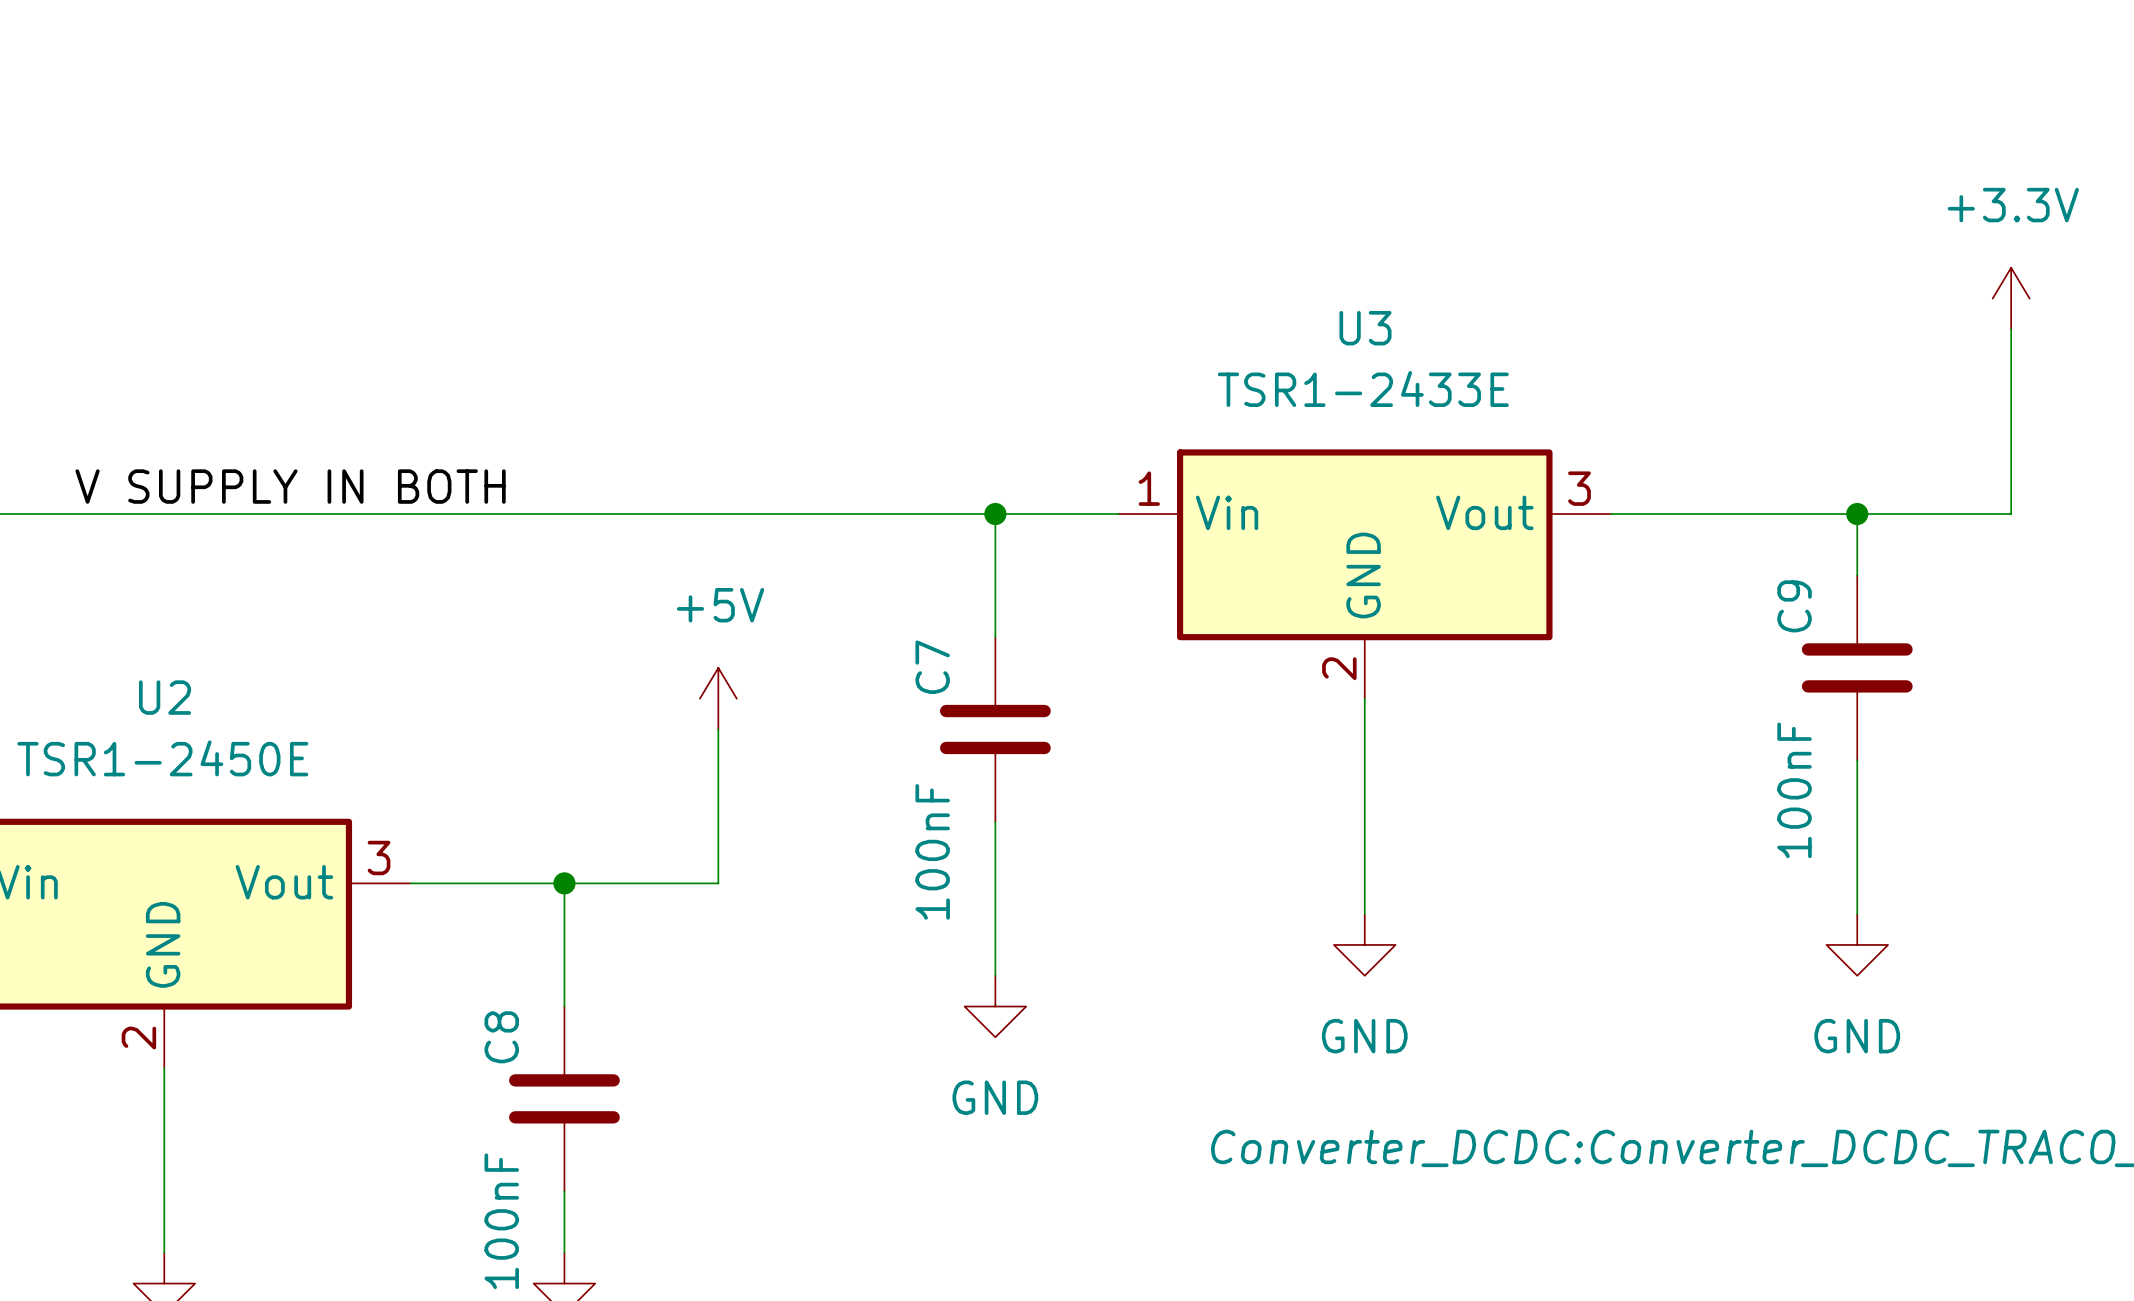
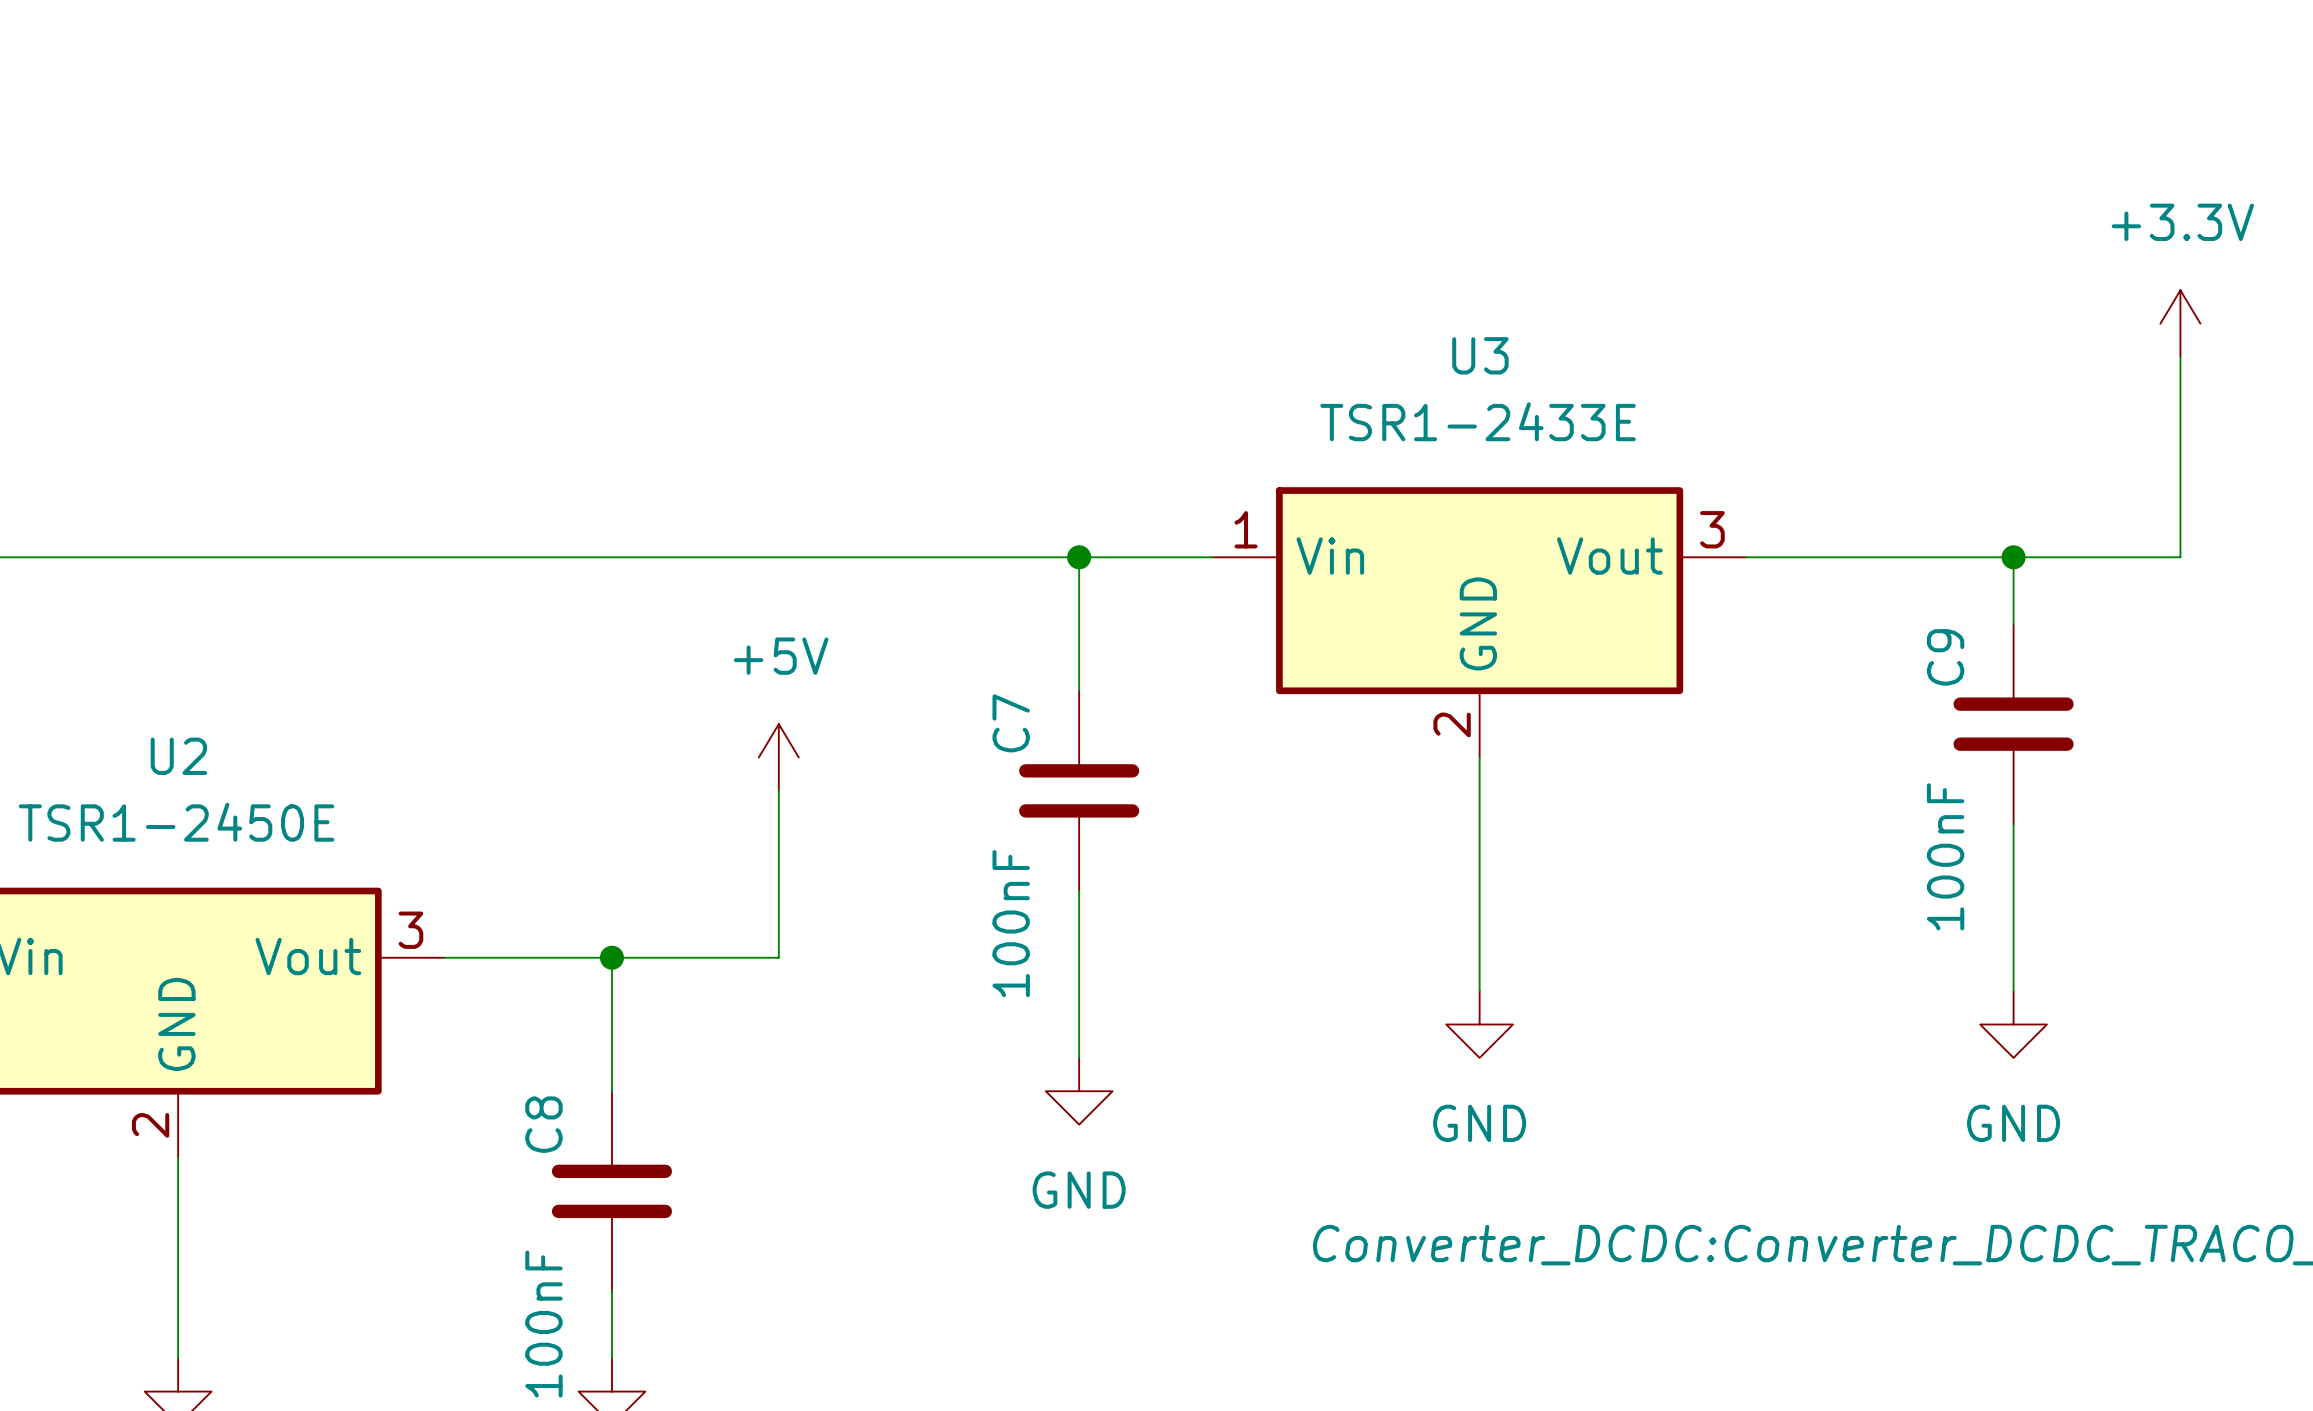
label: V SUPPLY IN BOTH (290, 486) -> none

